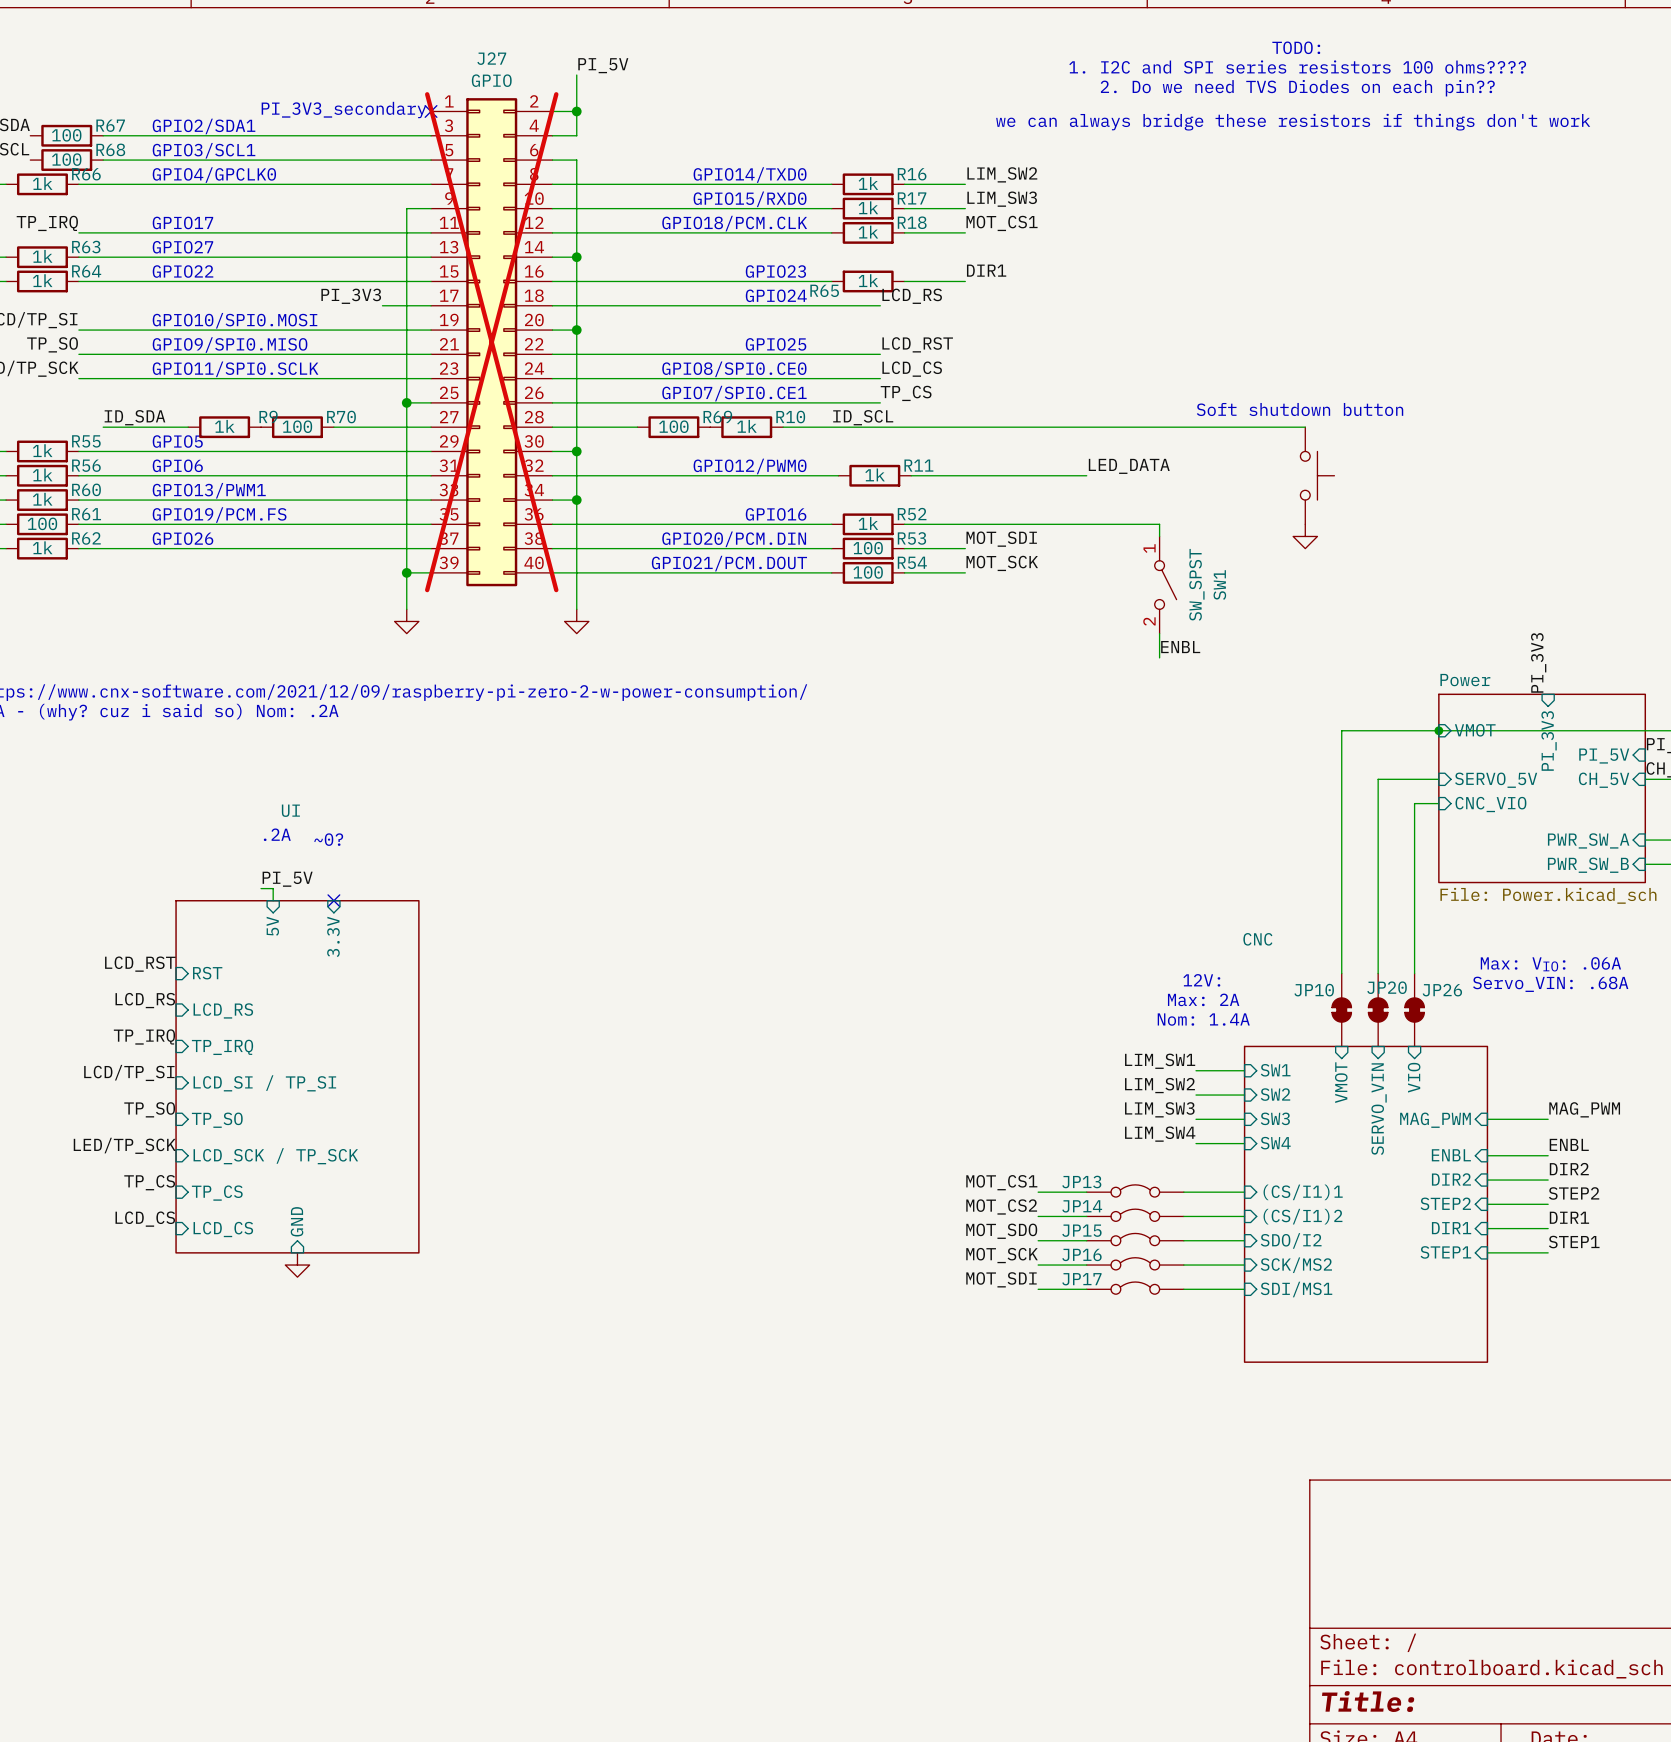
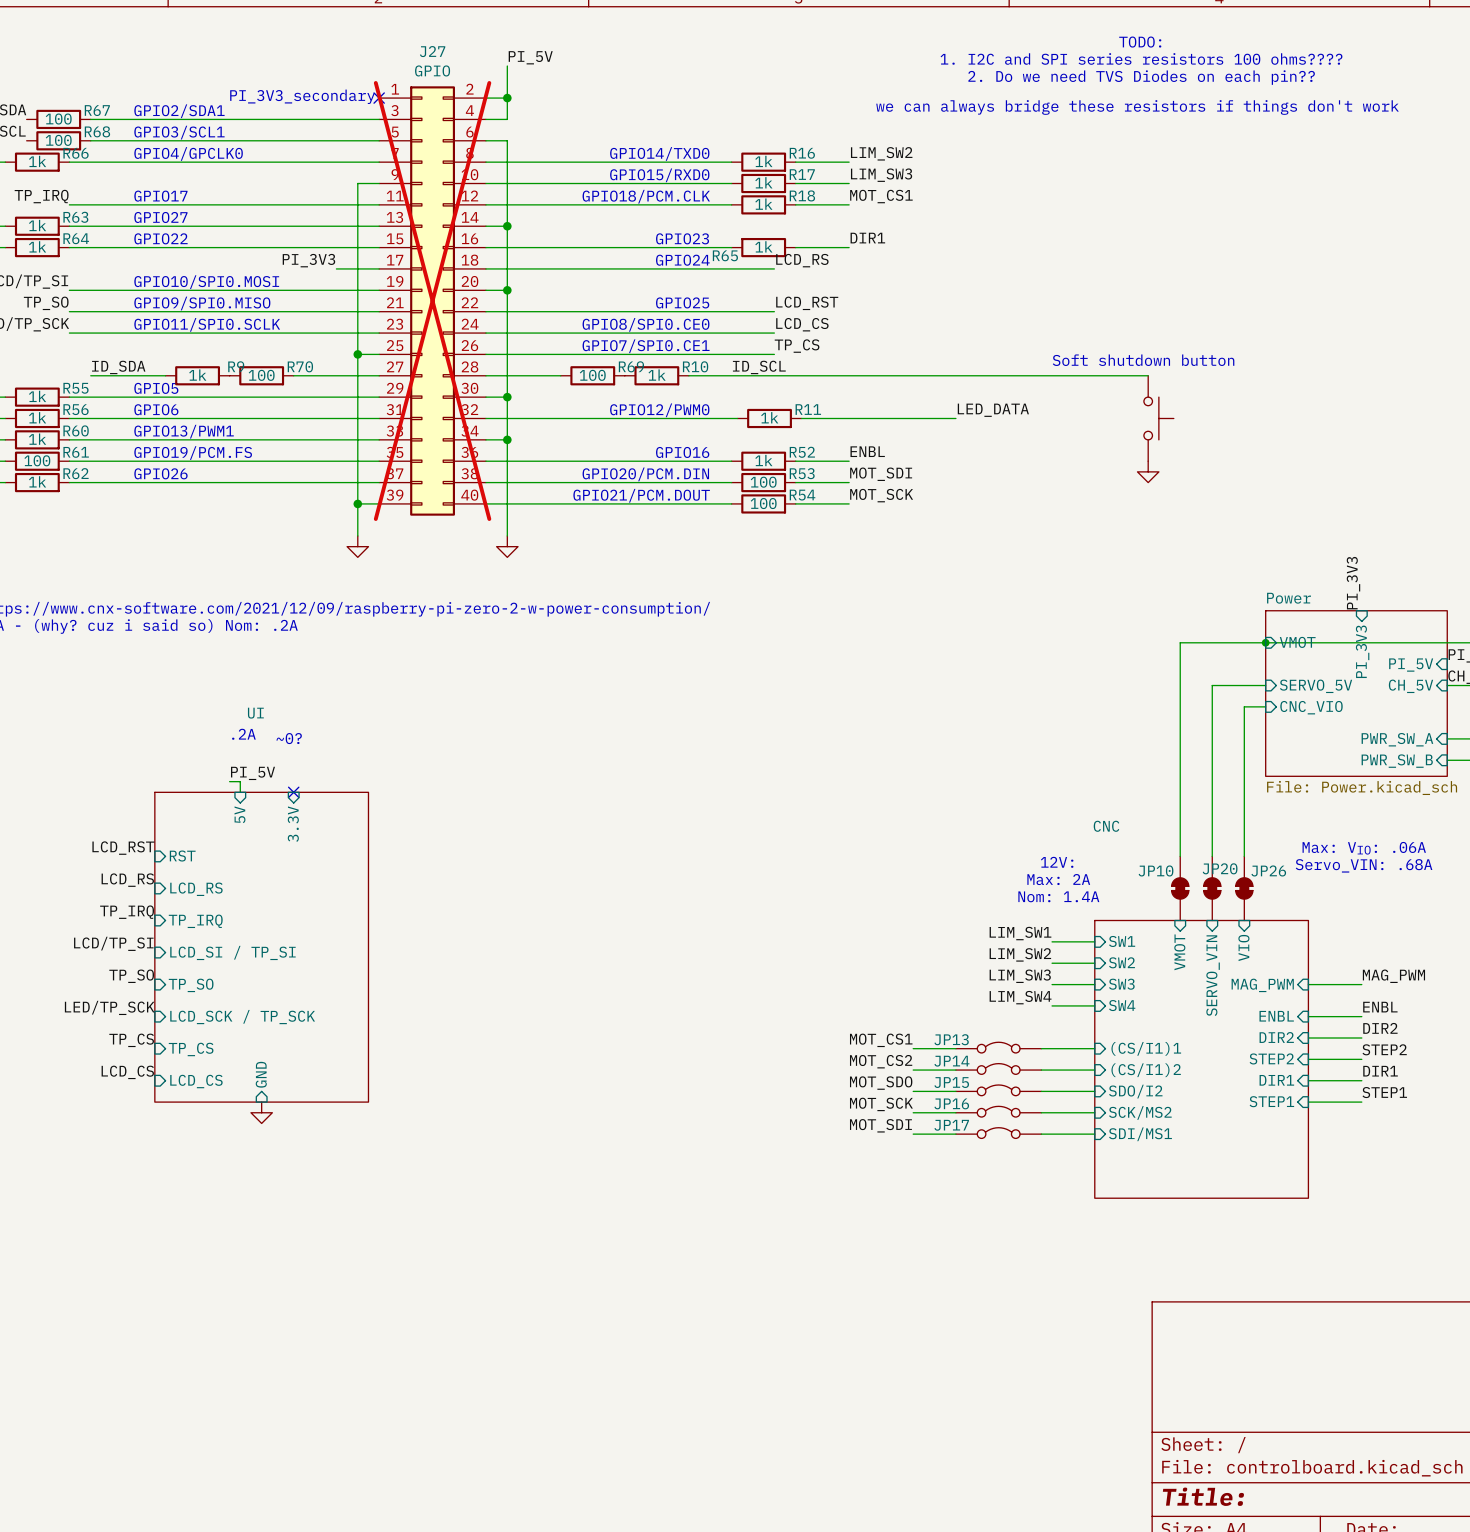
wire: (965, 524) (1159, 524) (1159, 536) -> none
SW1: SW_SPST (1165, 585) -> none
wire: (1159, 633) (1159, 657) -> none
label position: ENBL (1180, 647) -> ENBL (867, 451)

